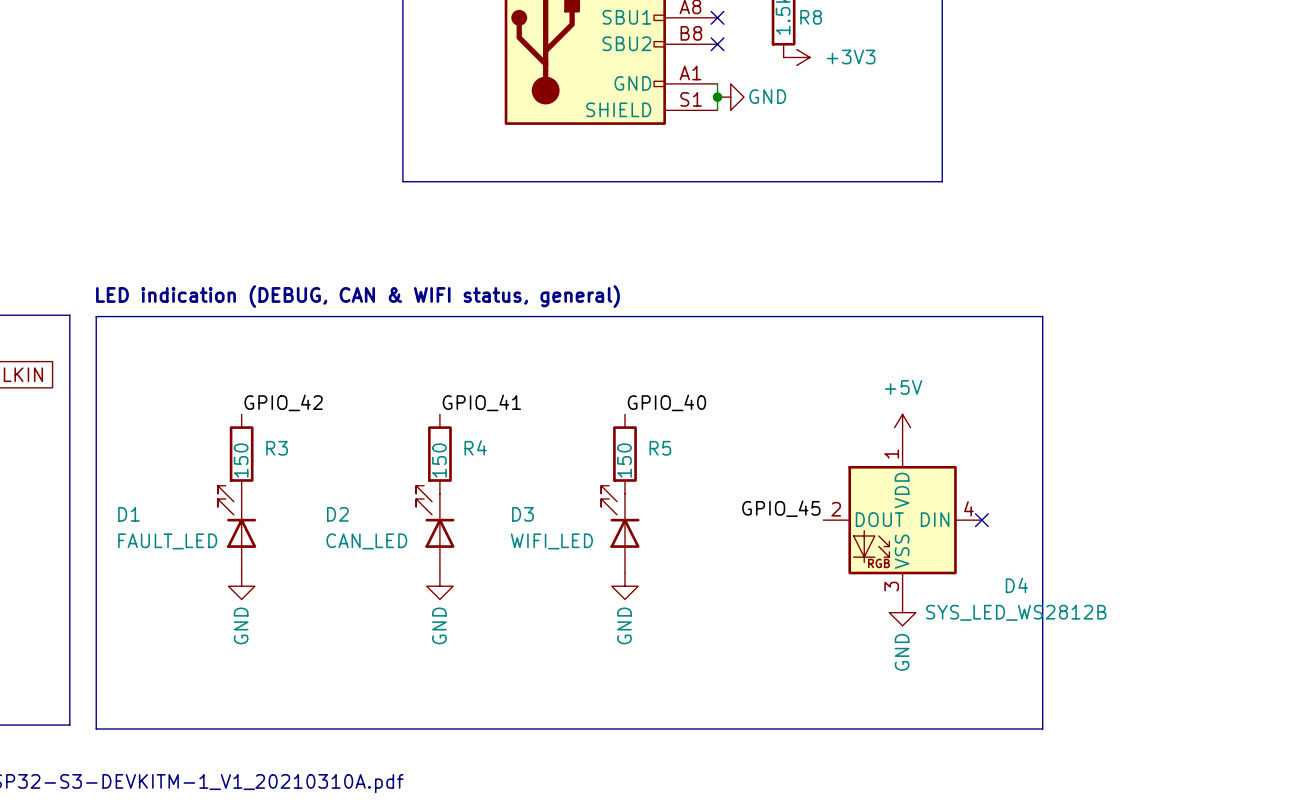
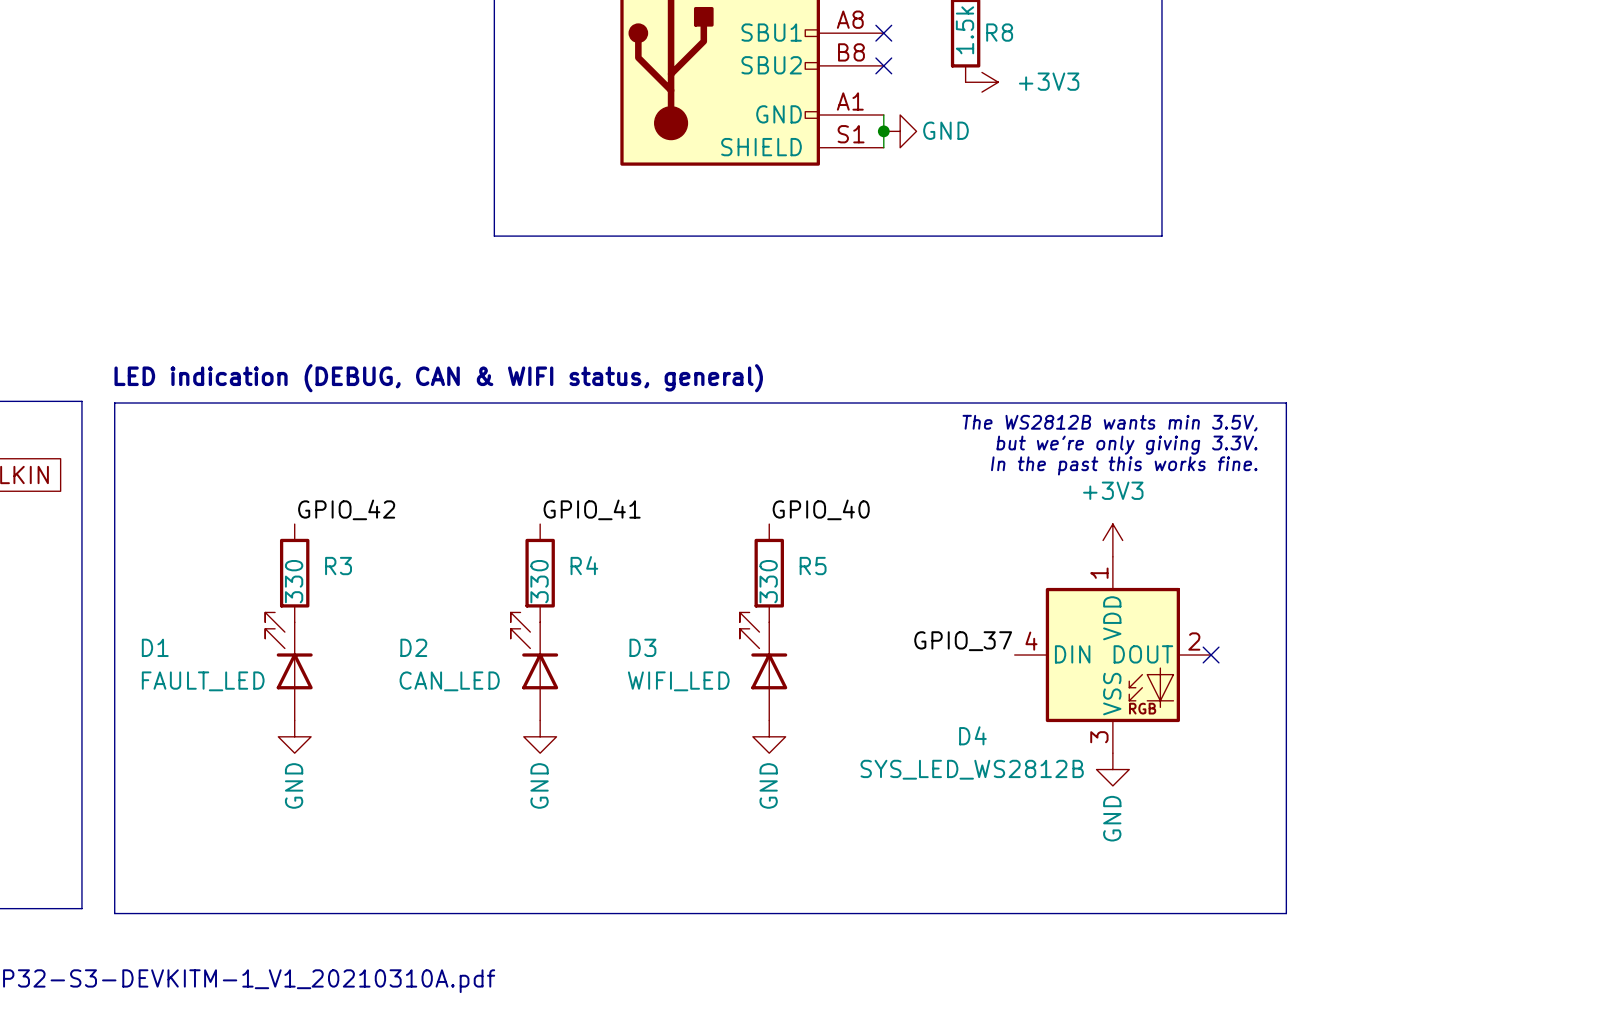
text: none -> The WS2812B wants min 3.5V, (1110, 423)
text: none -> but we're only giving 3.3V. (1127, 445)
text: none -> In the past this works fine. (1124, 465)
power symbol: +5V (902, 427) -> +3V3 (1112, 540)
R3 value: 150 (241, 460) -> 330 (294, 581)
R4 value: 150 (439, 460) -> 330 (539, 581)
R5 value: 150 (624, 460) -> 330 (768, 581)
label: GPIO_45 (781, 508) -> GPIO_37 (963, 641)
D4 flip: as is (902, 520) -> left-right (1112, 655)

